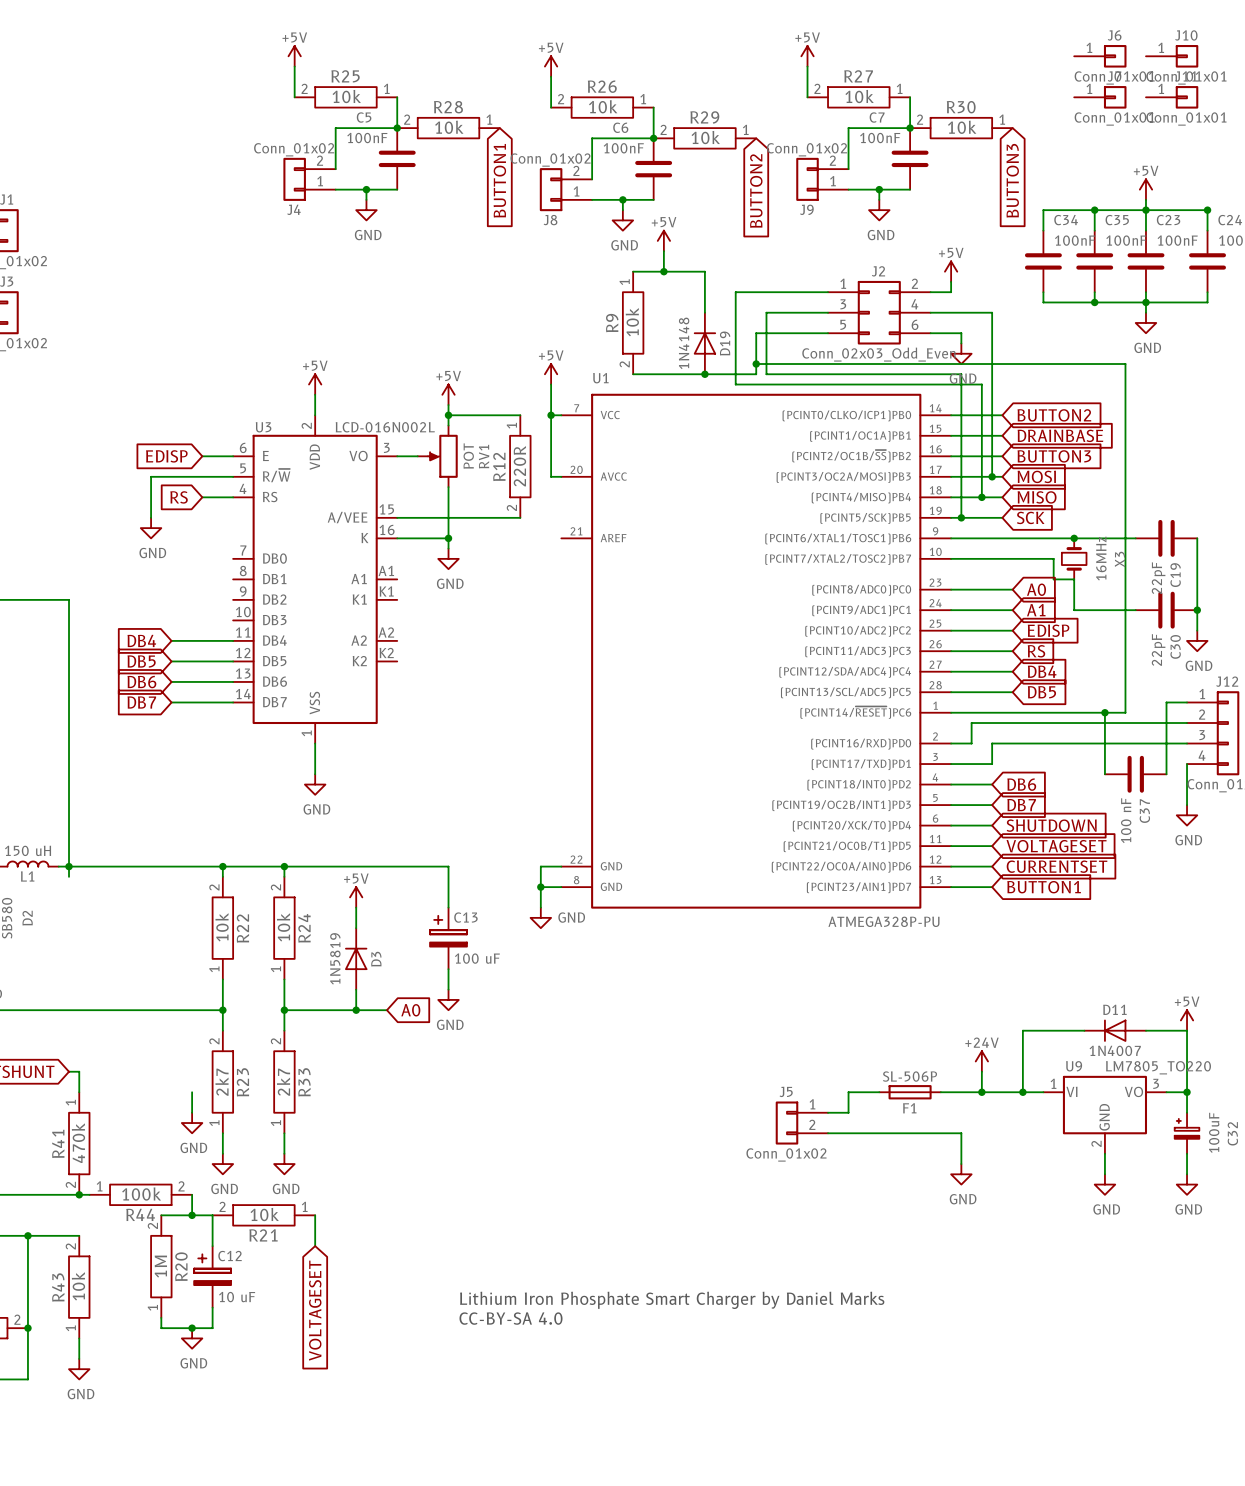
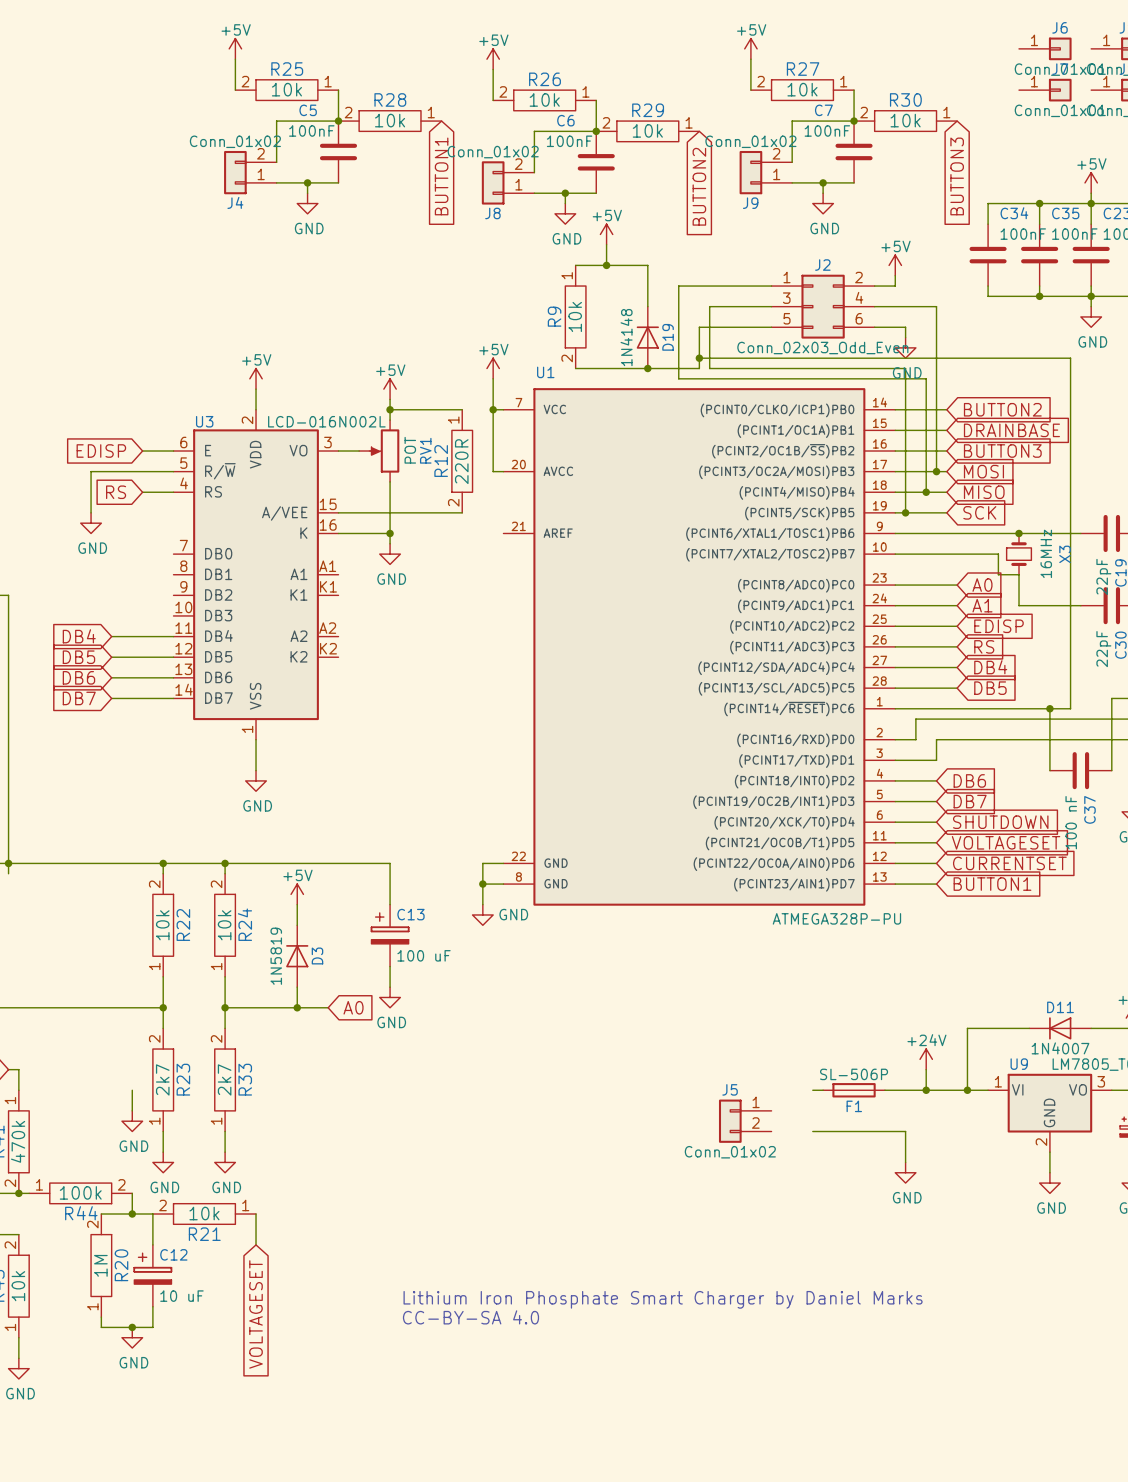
wire: (869, 1092) (848, 1092) (848, 1112) (828, 1112) -> none
wire: (828, 1133) (869, 1133) -> none

